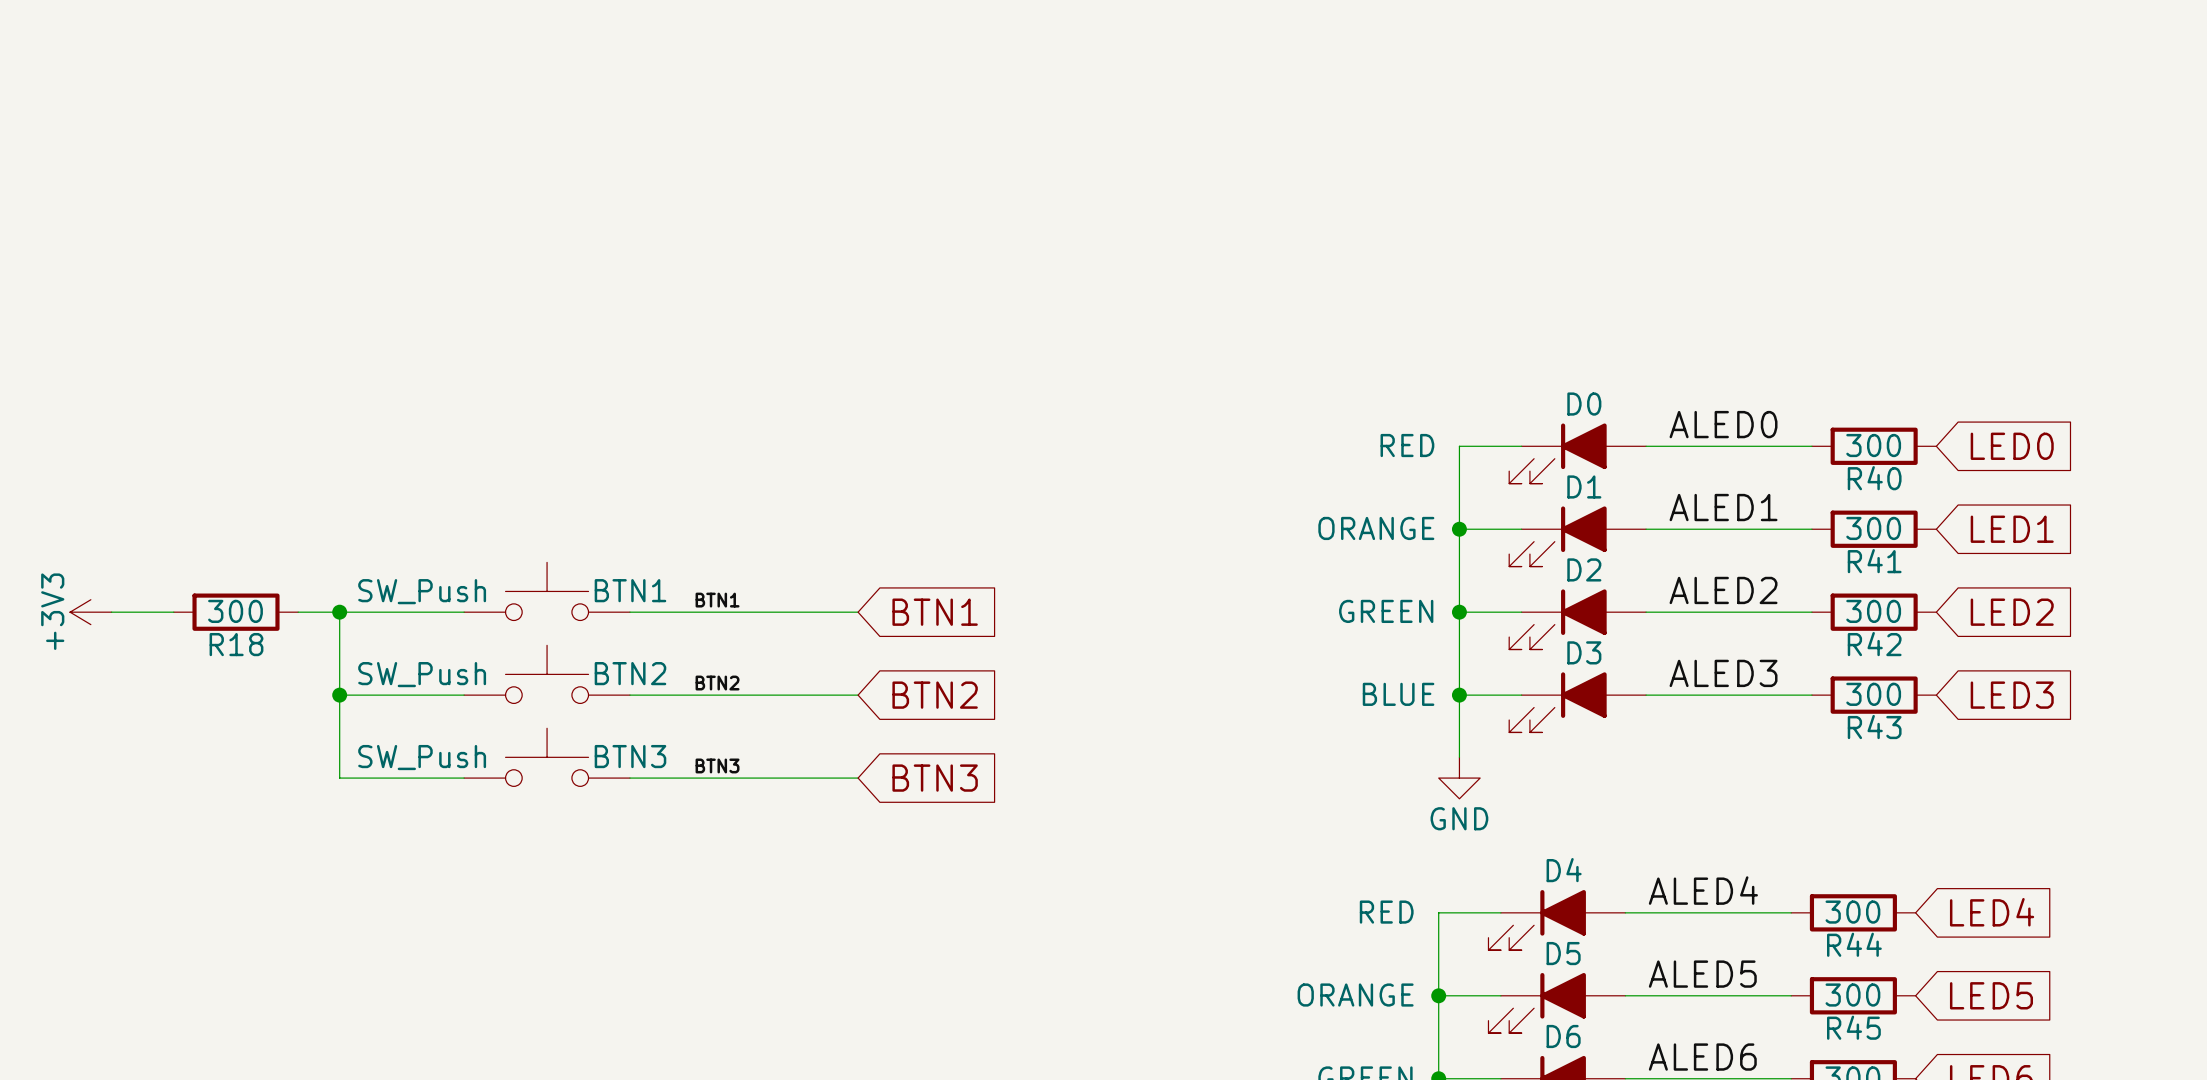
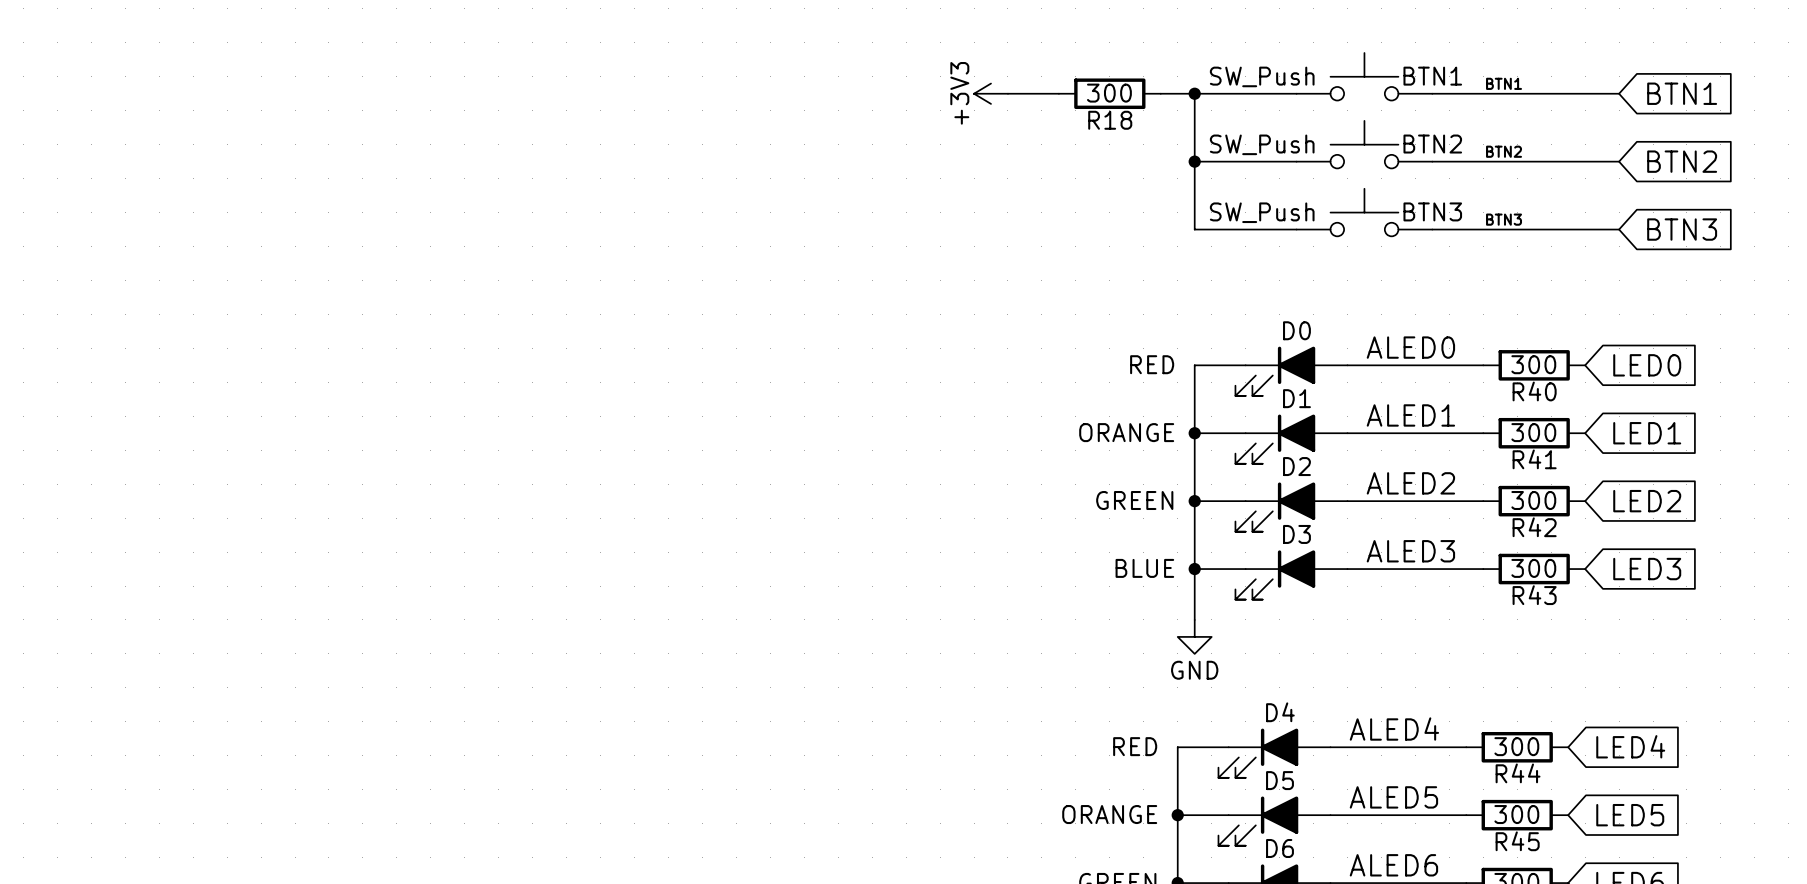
label: none -> BTN1 (1504, 83)
power symbol: none -> +3V3 (991, 93)
wire: none -> (1007, 93) (1058, 93)
wire: none -> (1160, 93) (1296, 93)
wire: none -> (1194, 93) (1194, 229) (1296, 229)
junction: none -> (1194, 93)
wire: none -> (1432, 93) (1619, 93)
global label: none -> BTN1 (1682, 93)
label: none -> BTN2 (1504, 151)
wire: none -> (1194, 161) (1296, 161)
junction: none -> (1194, 161)
wire: none -> (1432, 161) (1619, 161)
global label: none -> BTN2 (1682, 161)
label: none -> BTN3 (1504, 219)
wire: none -> (1432, 229) (1619, 229)
global label: none -> BTN3 (1682, 229)
BTN1 position: (547, 591) -> (1364, 76)
label: BTN1 (717, 600) -> none
power symbol: +3V3 (90, 612) -> none
wire: (111, 612) (173, 612) -> none
R18 position: (236, 612) -> (1109, 93)
wire: (298, 612) (464, 612) -> none
wire: (339, 612) (339, 778) (464, 778) -> none
junction: (339, 612) -> none
wire: (629, 612) (858, 612) -> none
global label: BTN1 (935, 612) -> none
BTN2 position: (547, 674) -> (1364, 144)
label: BTN2 (717, 683) -> none
wire: (339, 695) (464, 695) -> none
junction: (339, 695) -> none
wire: (629, 695) (858, 695) -> none
global label: BTN2 (935, 695) -> none
BTN3 position: (547, 757) -> (1364, 212)
label: BTN3 (717, 765) -> none
wire: (629, 778) (858, 778) -> none
global label: BTN3 (935, 778) -> none

